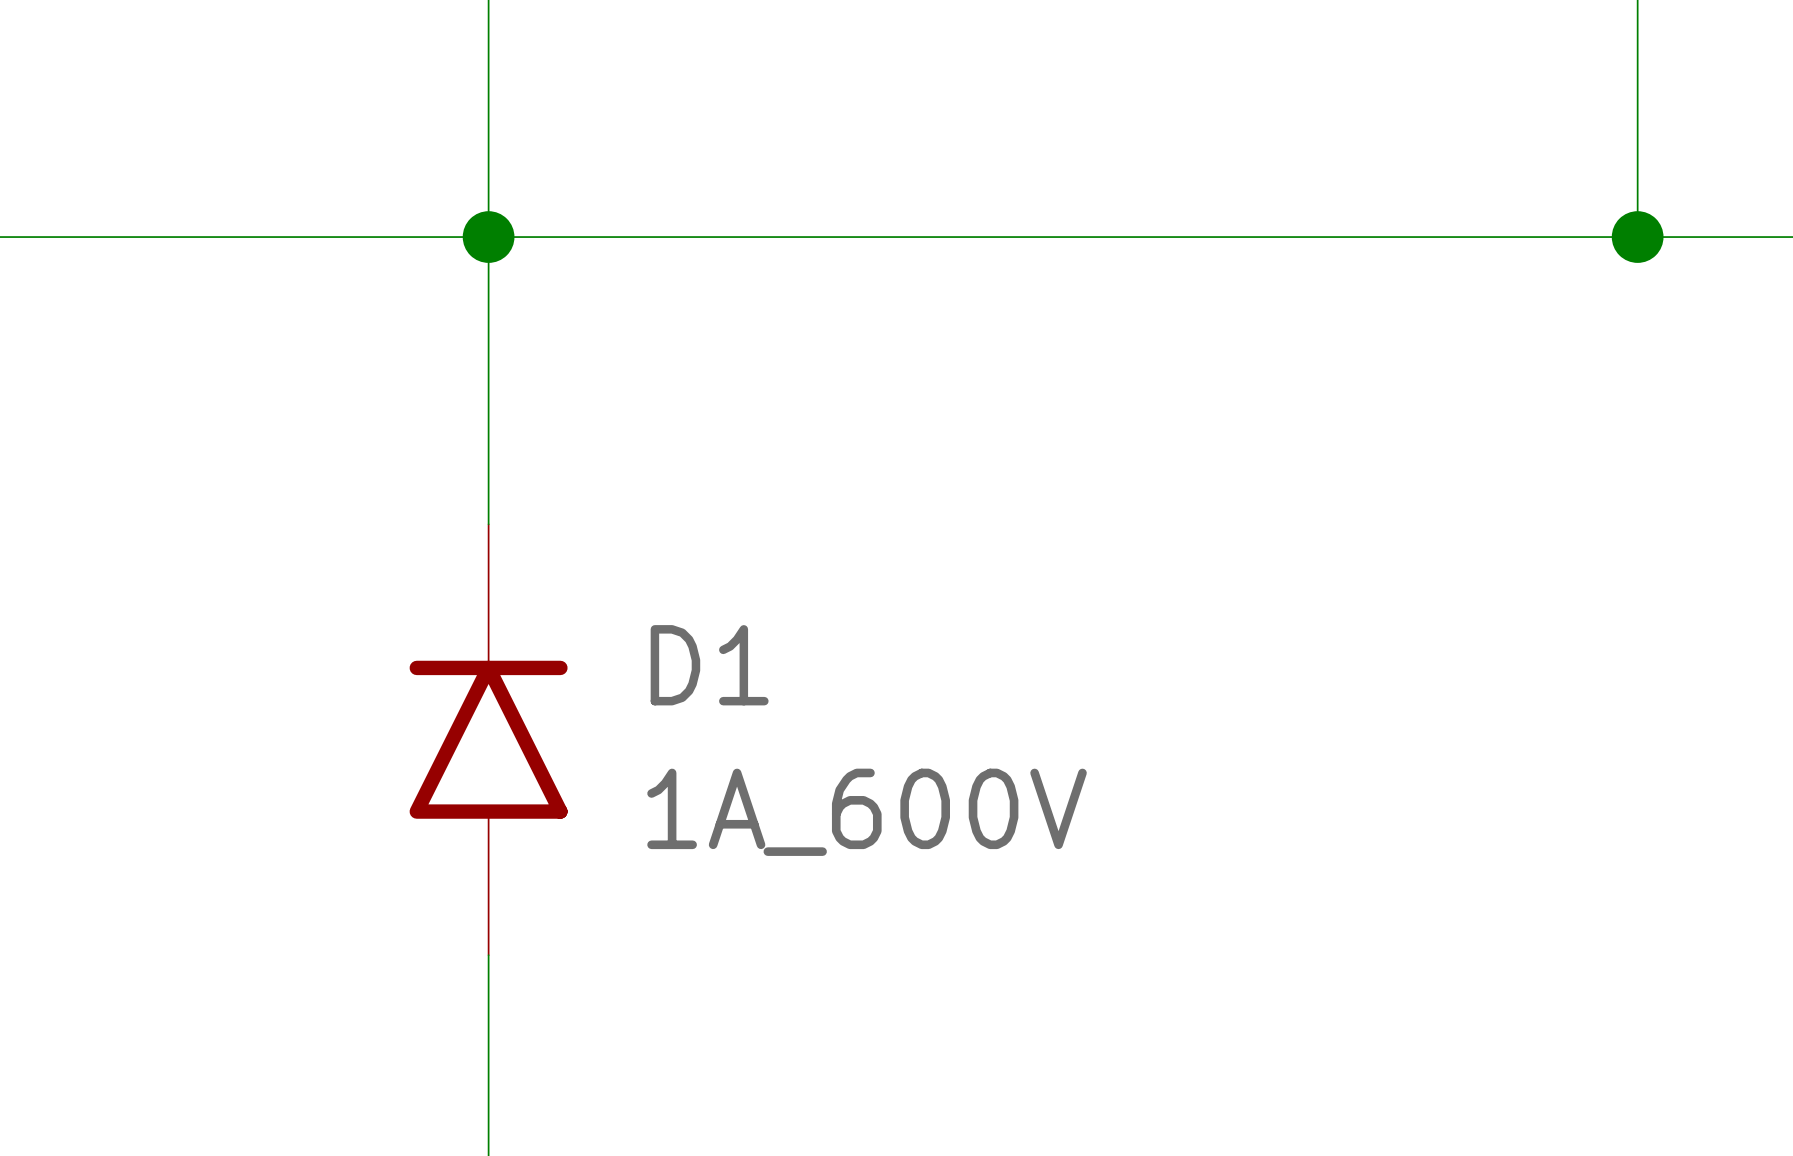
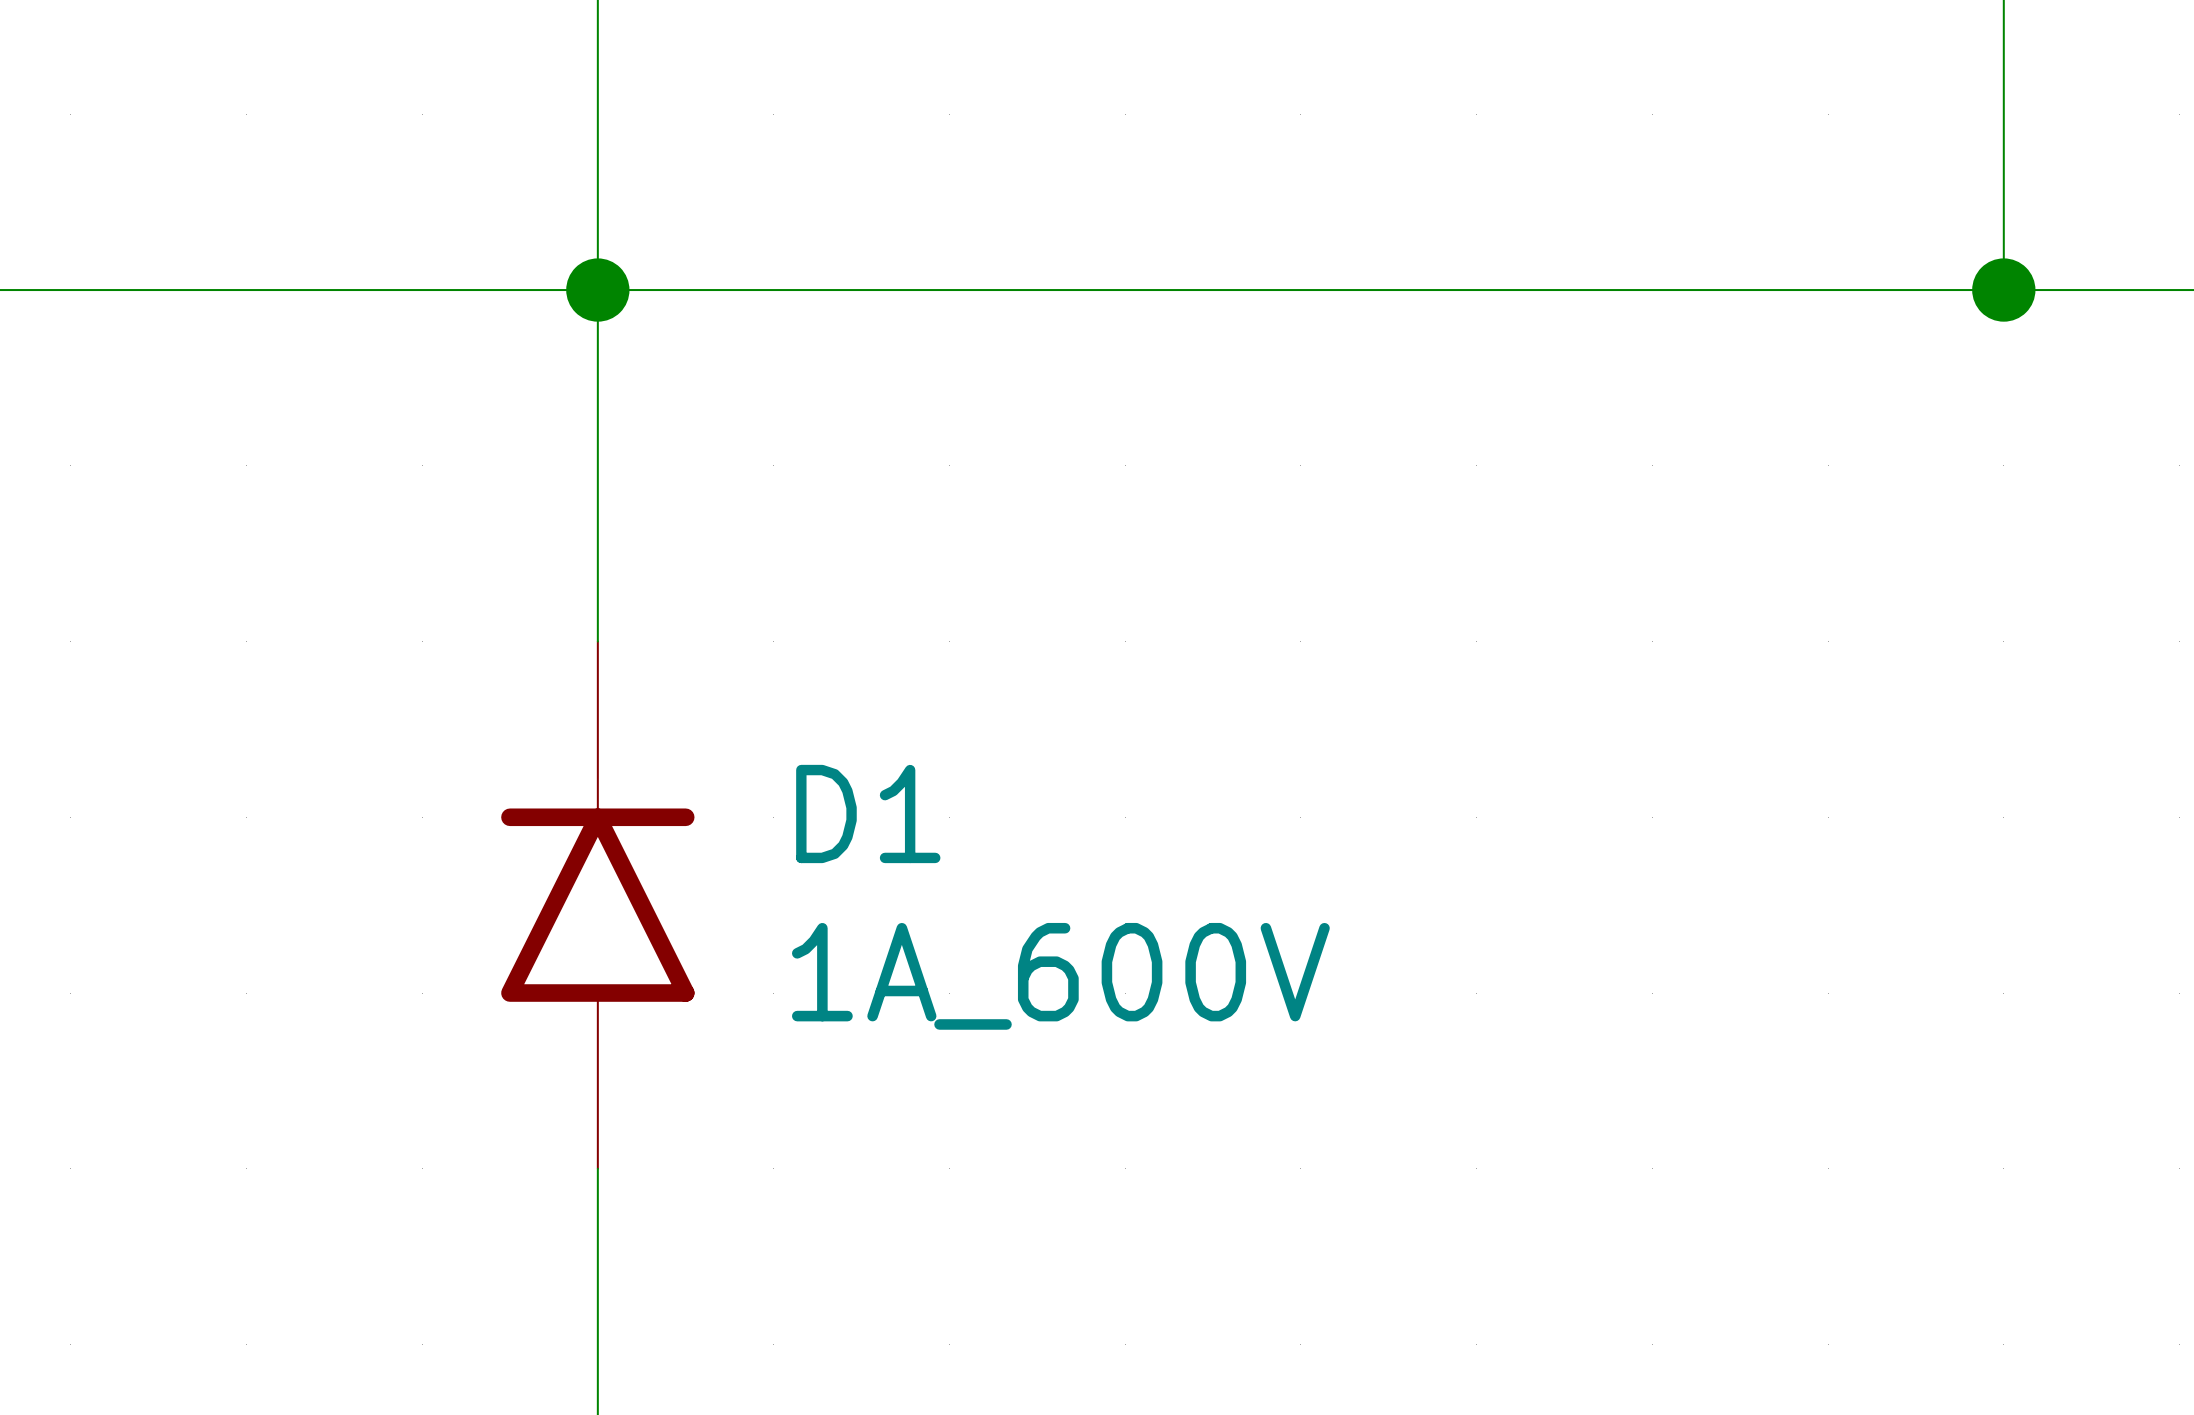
D1 text position: 1A_600V (867, 812) -> 1A_600V (1060, 976)

